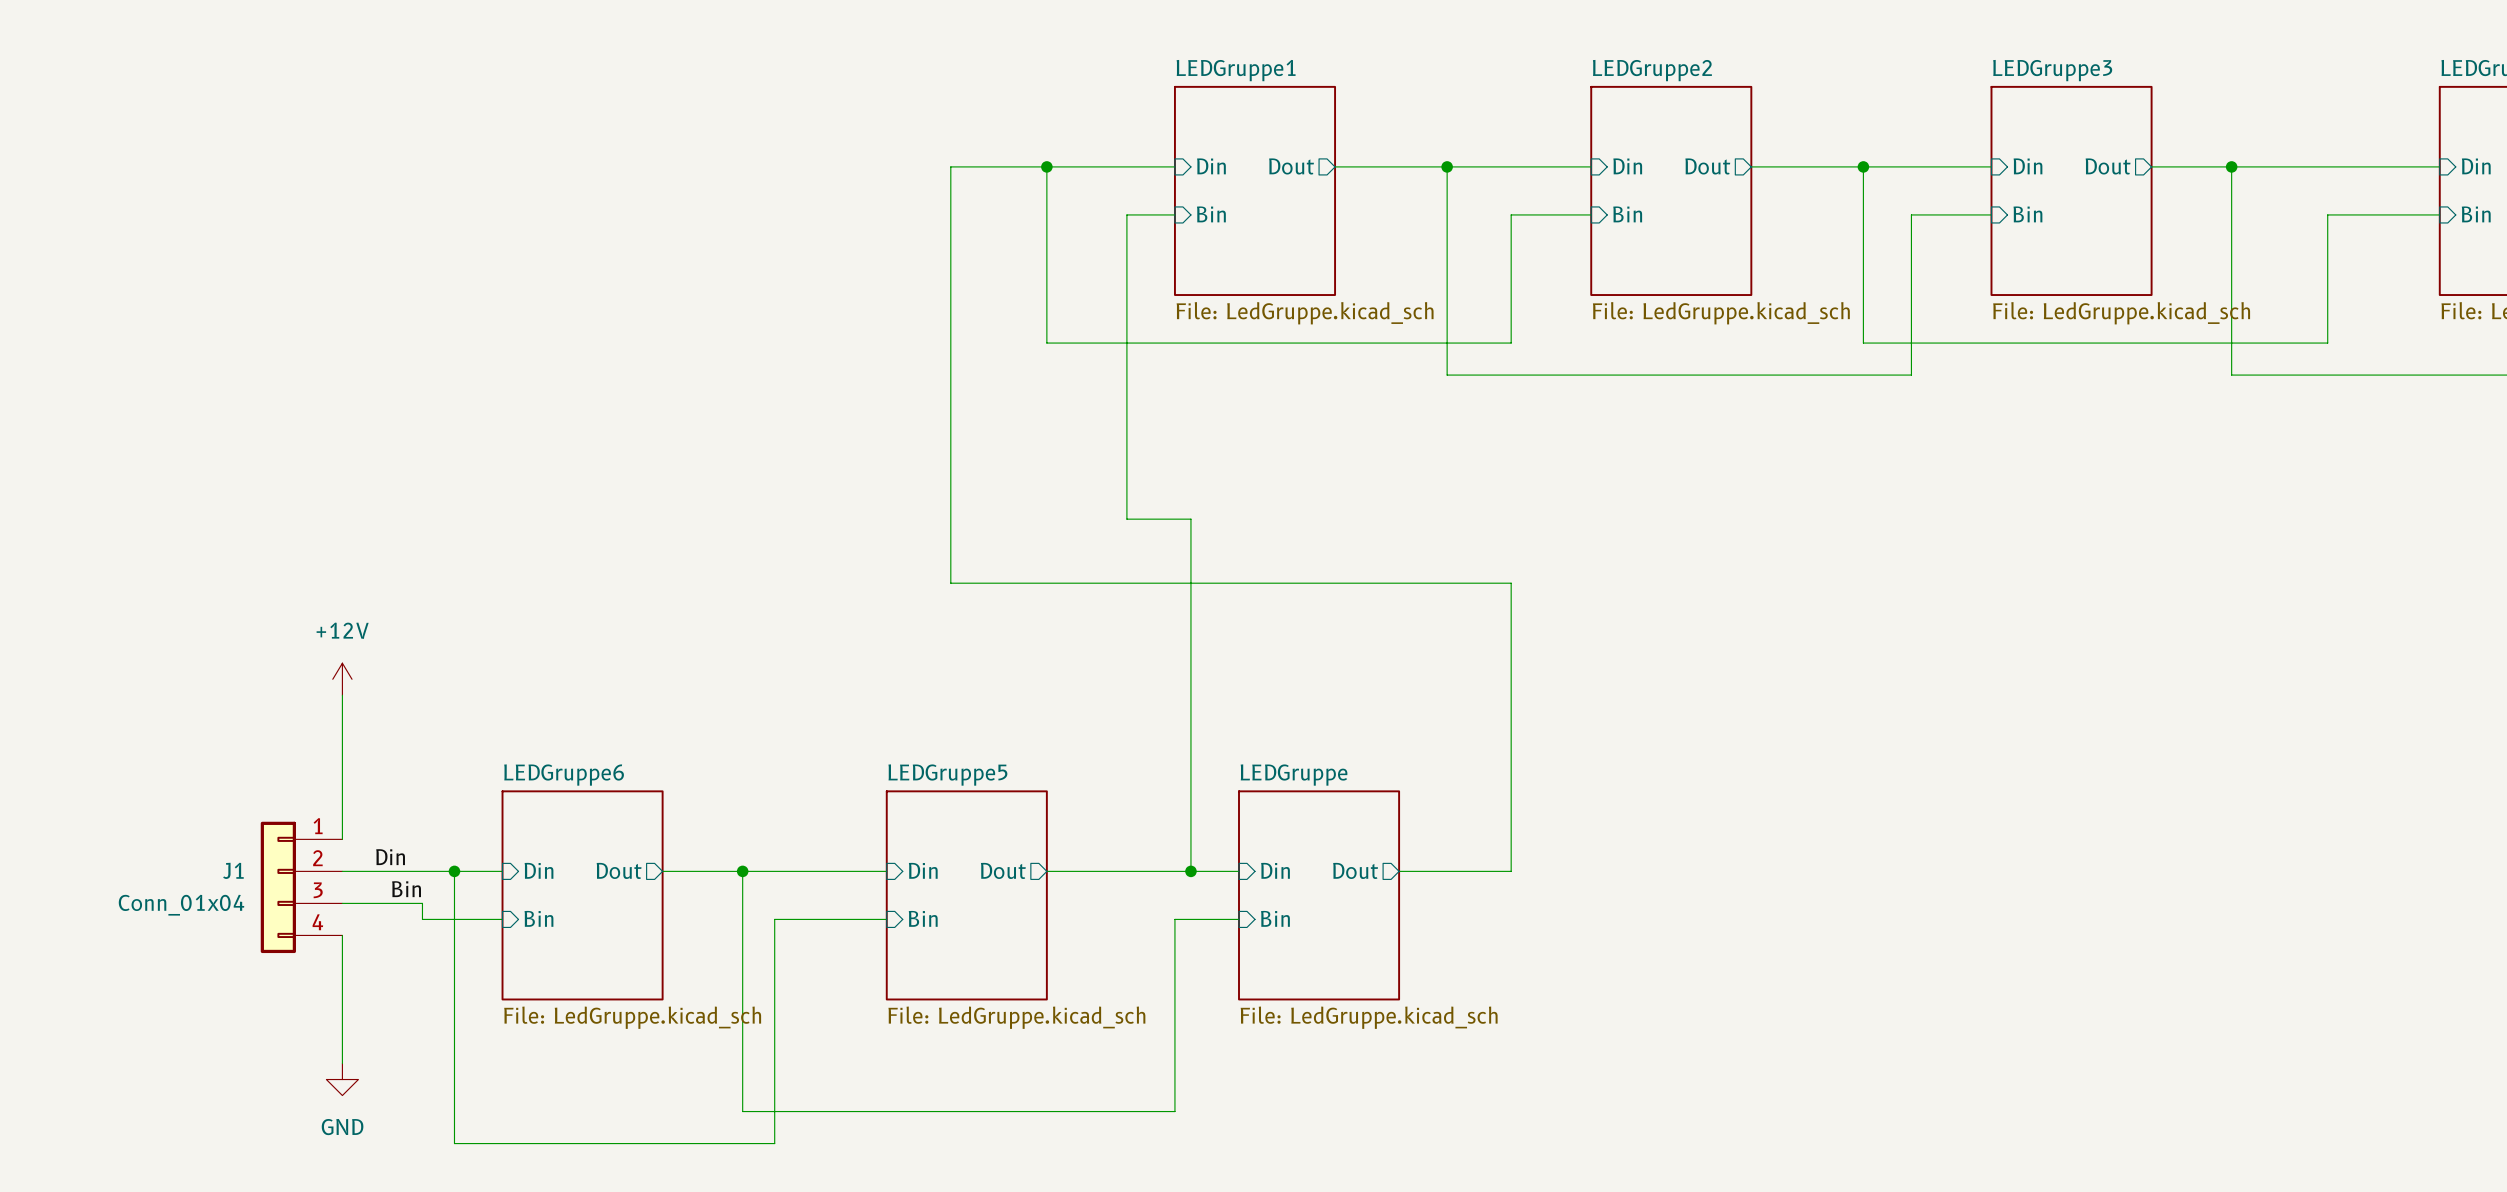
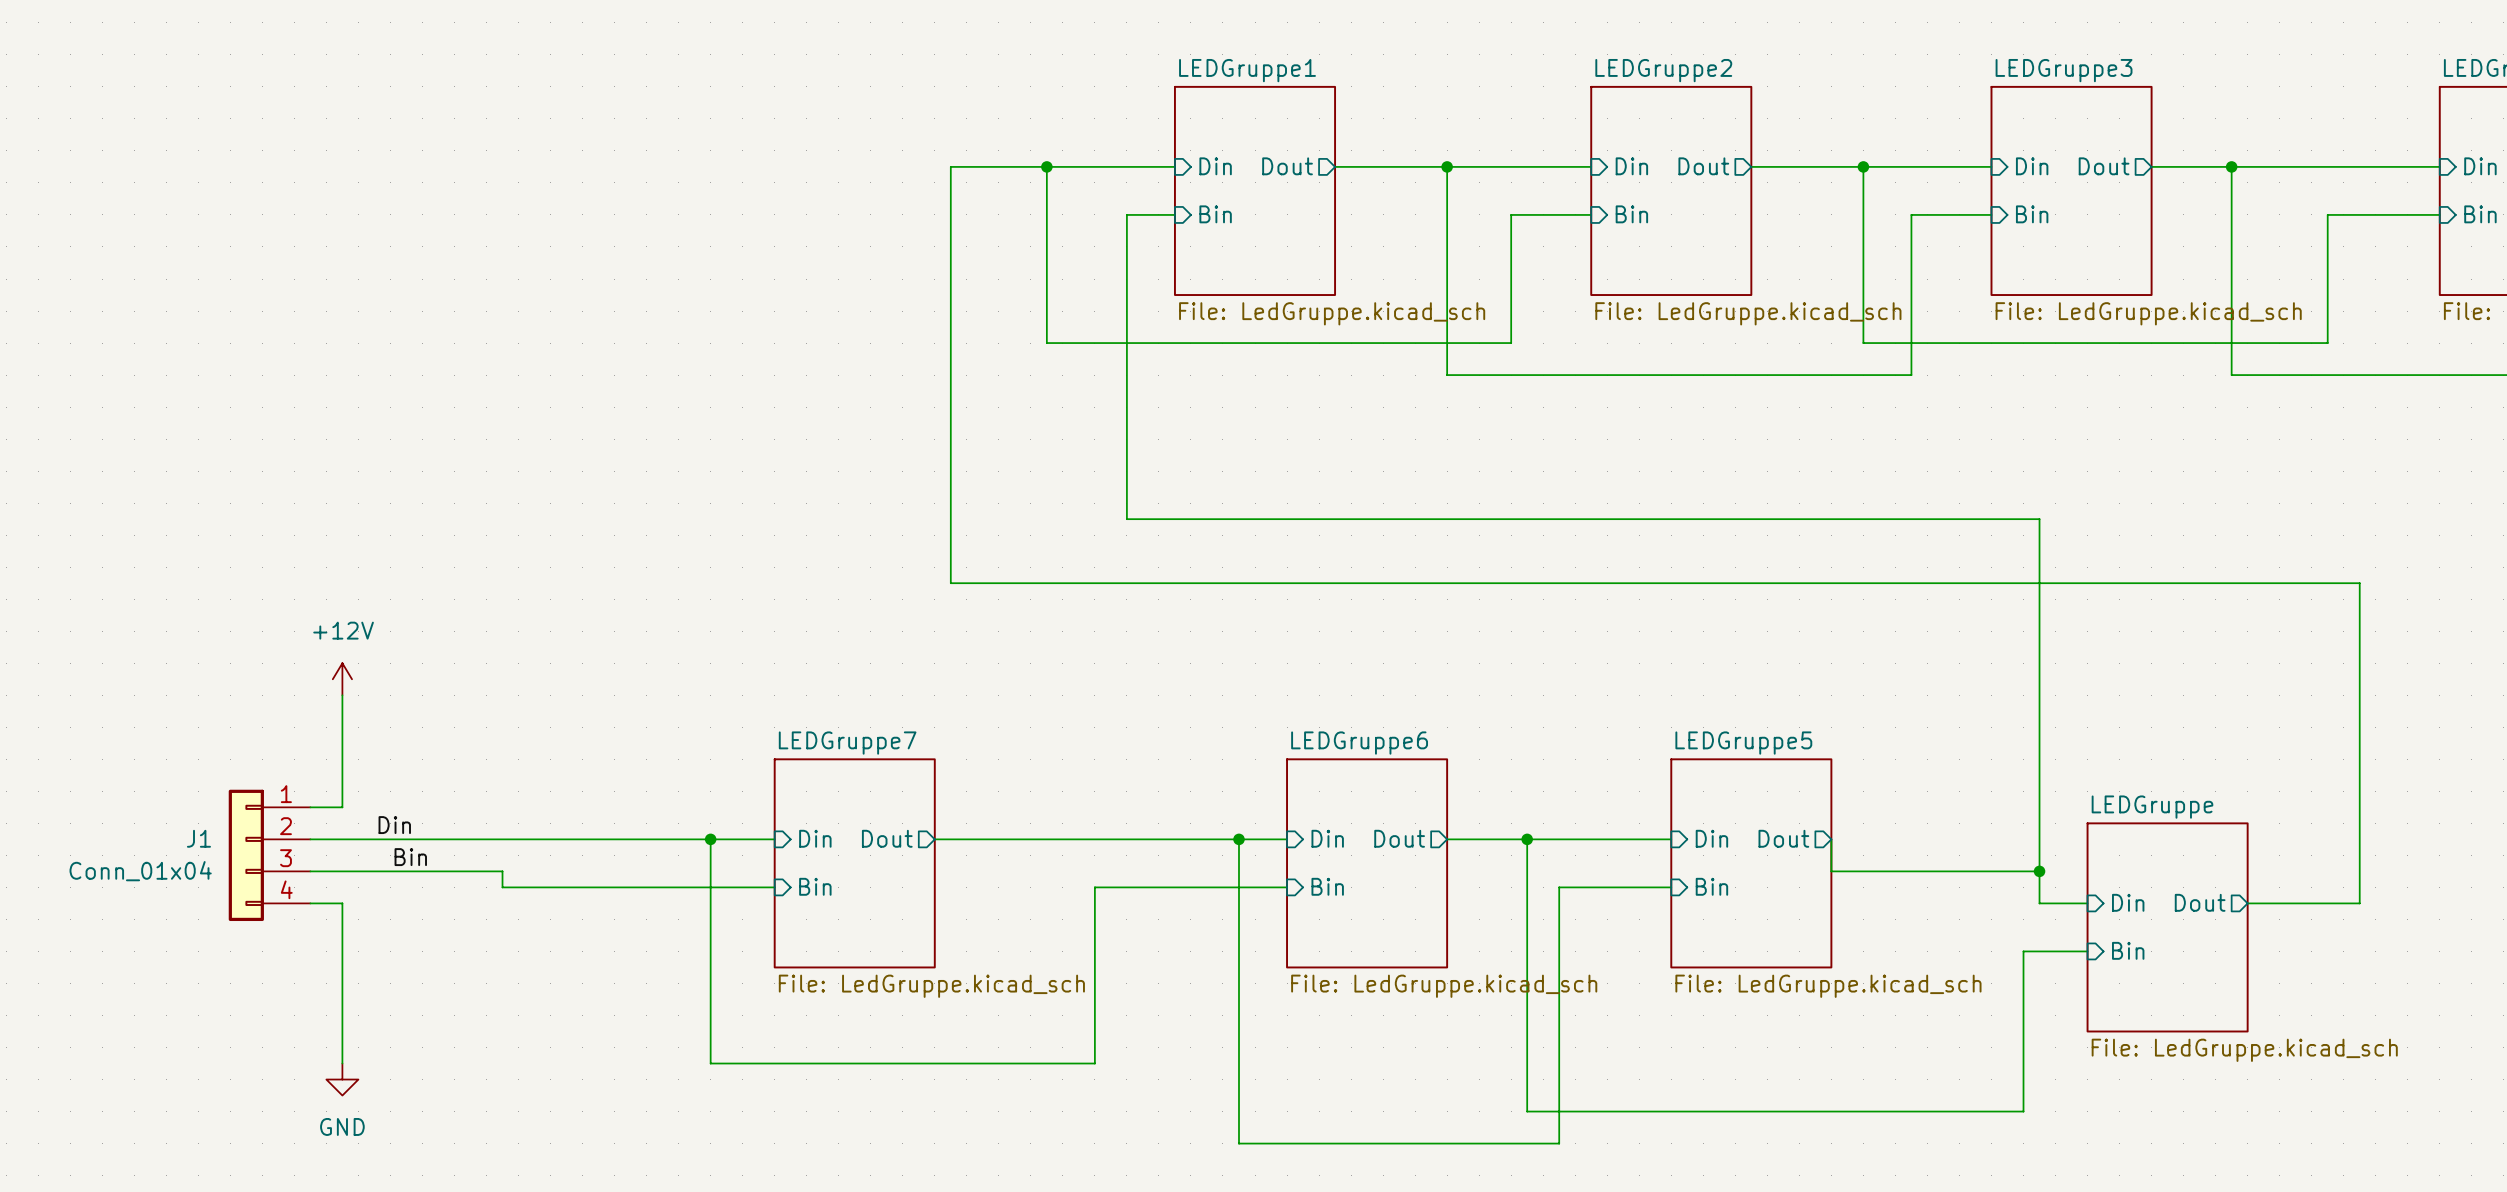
wire: (1190, 519) (1190, 871) -> (1190, 519) (2039, 519) (2039, 903) (2087, 903)
wire: (1511, 583) (1511, 871) (1399, 871) -> (1511, 583) (2359, 583) (2359, 903) (2247, 903)
wire: (342, 807) (342, 839) -> (342, 807) (310, 807)
sheet pin: none -> Din (1711, 838)
sheet pin: none -> Dout (1783, 838)
wire: none -> (310, 839) (774, 839)
wire: none -> (710, 839) (710, 1063) (1094, 1063) (1094, 887) (1287, 887)
wire: none -> (934, 839) (1287, 839)
wire: none -> (1238, 839) (1238, 1143) (1559, 1143) (1559, 887) (1671, 887)
wire: none -> (1447, 839) (1671, 839)
wire: none -> (1527, 839) (1527, 1111) (2023, 1111) (2023, 951) (2087, 951)
junction: none -> (1527, 839)
wire: none -> (1831, 839) (1831, 871) (2039, 871)
label position: Din (390, 857) -> Din (394, 825)
sheet LEDGruppe7: none -> File: LedGruppe.kicad_sch (854, 863)
sheet pin: Din (539, 870) -> none
sheet pin: Dout (619, 870) -> none
sheet pin position: Din (923, 870) -> Din (815, 838)
sheet pin position: Dout (1003, 870) -> Dout (887, 838)
sheet pin position: Din (1275, 870) -> Din (1327, 838)
sheet pin position: Dout (1355, 870) -> Dout (1399, 838)
wire: (454, 871) (454, 1143) (774, 1143) (774, 919) (886, 919) -> none
junction: (454, 871) -> none
wire: none -> (502, 871) (502, 887) (774, 887)
wire: (662, 871) (886, 871) -> none
wire: (742, 871) (742, 1111) (1174, 1111) (1174, 919) (1238, 919) -> none
junction position: (742, 871) -> (710, 839)
wire: (1046, 871) (1238, 871) -> none
junction position: (1190, 871) -> (1238, 839)
junction: none -> (2039, 871)
sheet pin: none -> Bin (1711, 886)
J1 position: (301, 887) -> (269, 855)
label position: Bin (406, 889) -> Bin (410, 857)
sheet LEDGruppe6 position: (582, 895) -> (1367, 863)
sheet LEDGruppe5 position: (966, 895) -> (1751, 863)
sheet LEDGruppe: File: LedGruppe.kicad_sch (1319, 895) -> none
sheet pin: none -> Din (2128, 902)
sheet pin: none -> Dout (2200, 902)
wire: none -> (310, 903) (342, 903) (342, 935)
wire: (342, 903) (422, 903) (422, 919) (502, 919) -> none
sheet pin: Bin (538, 918) -> none
sheet pin position: Bin (923, 918) -> Bin (815, 886)
sheet pin position: Bin (1275, 918) -> Bin (1327, 886)
sheet LEDGruppe: none -> File: LedGruppe.kicad_sch (2167, 927)
sheet pin: none -> Bin (2128, 950)

